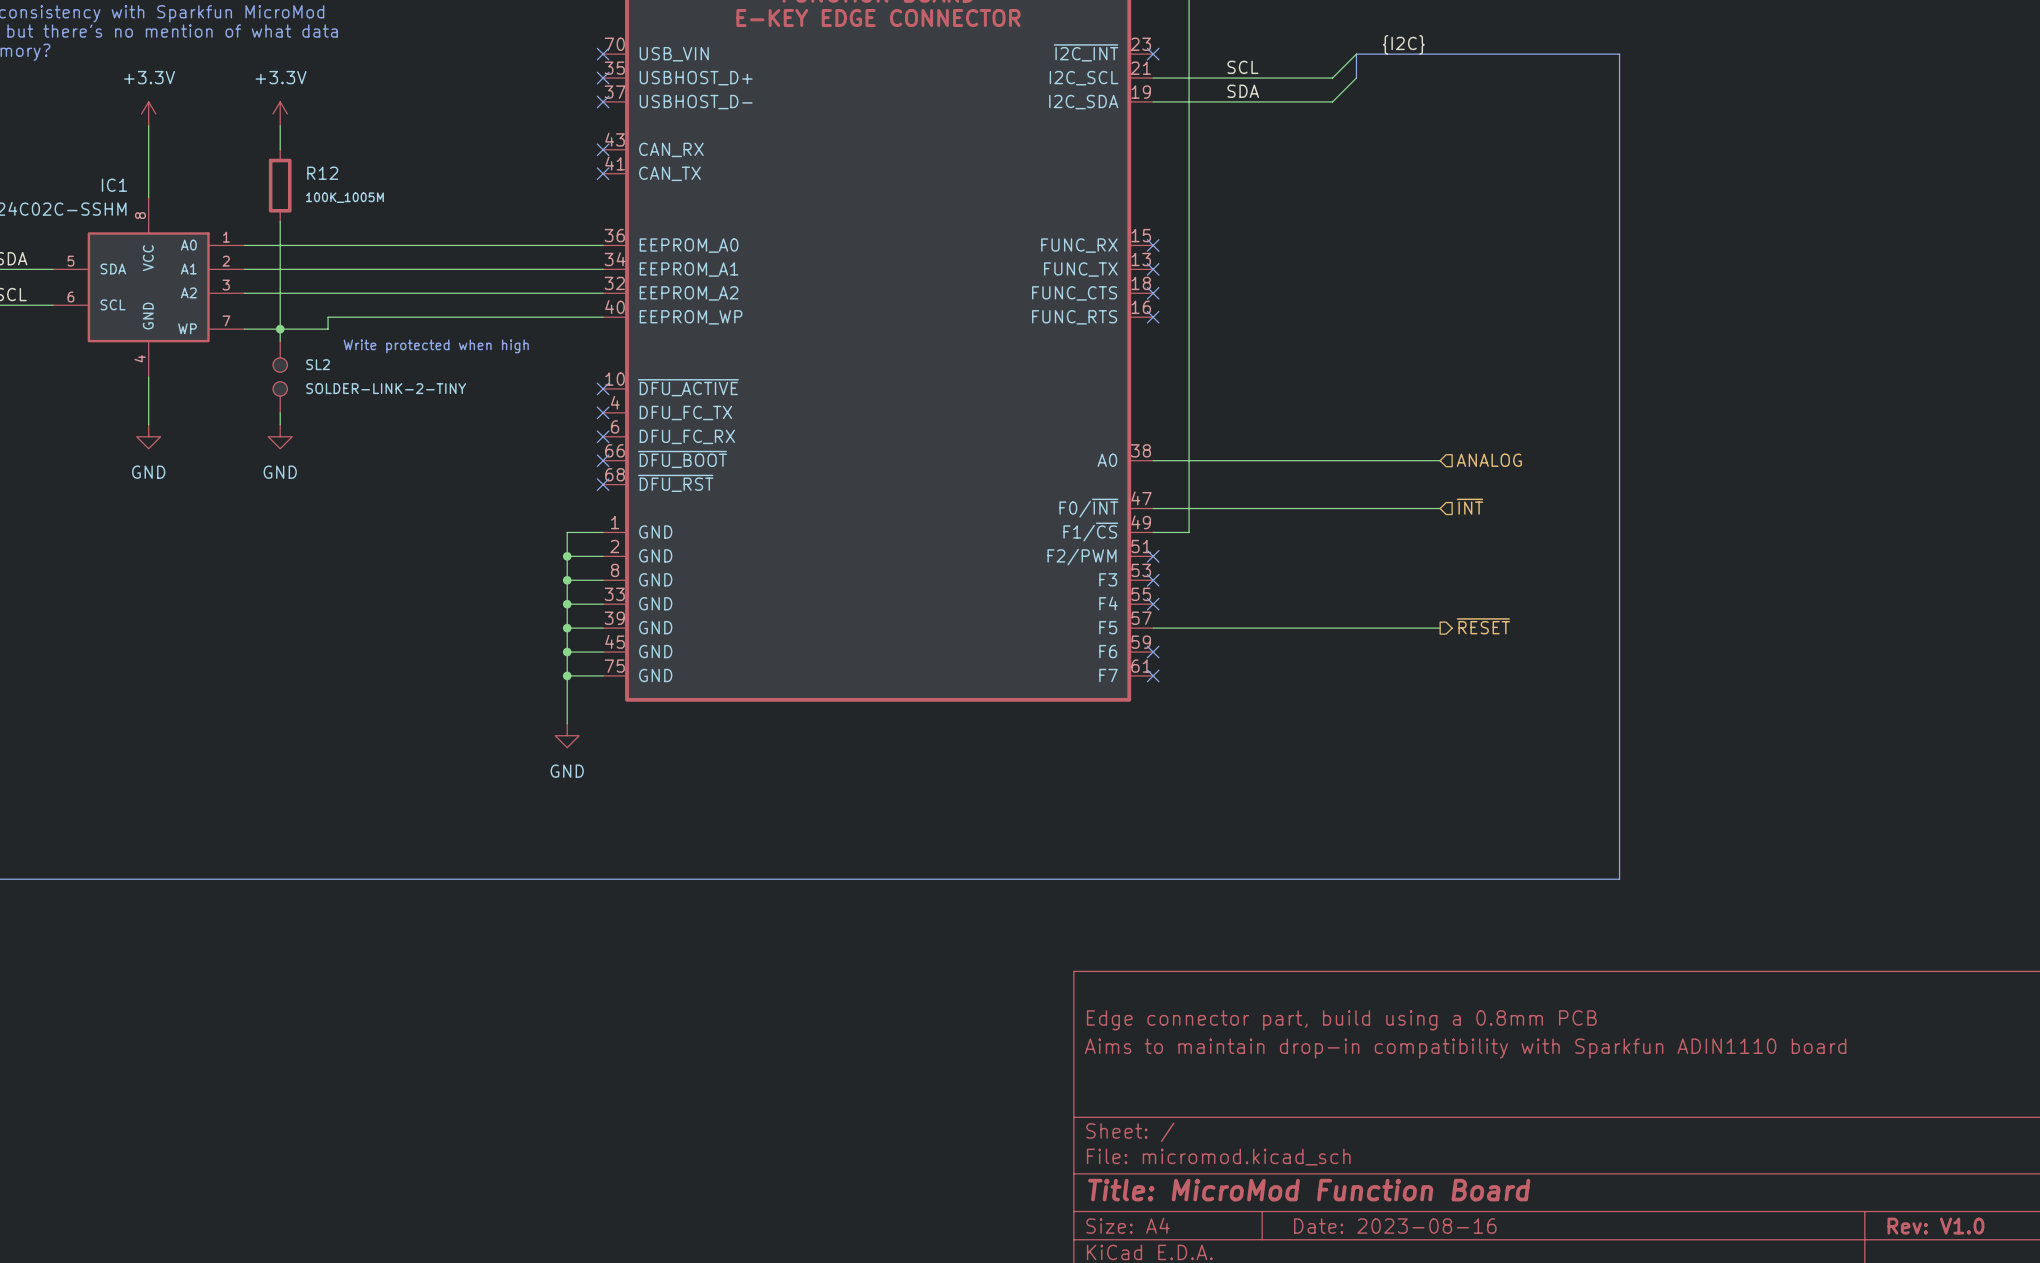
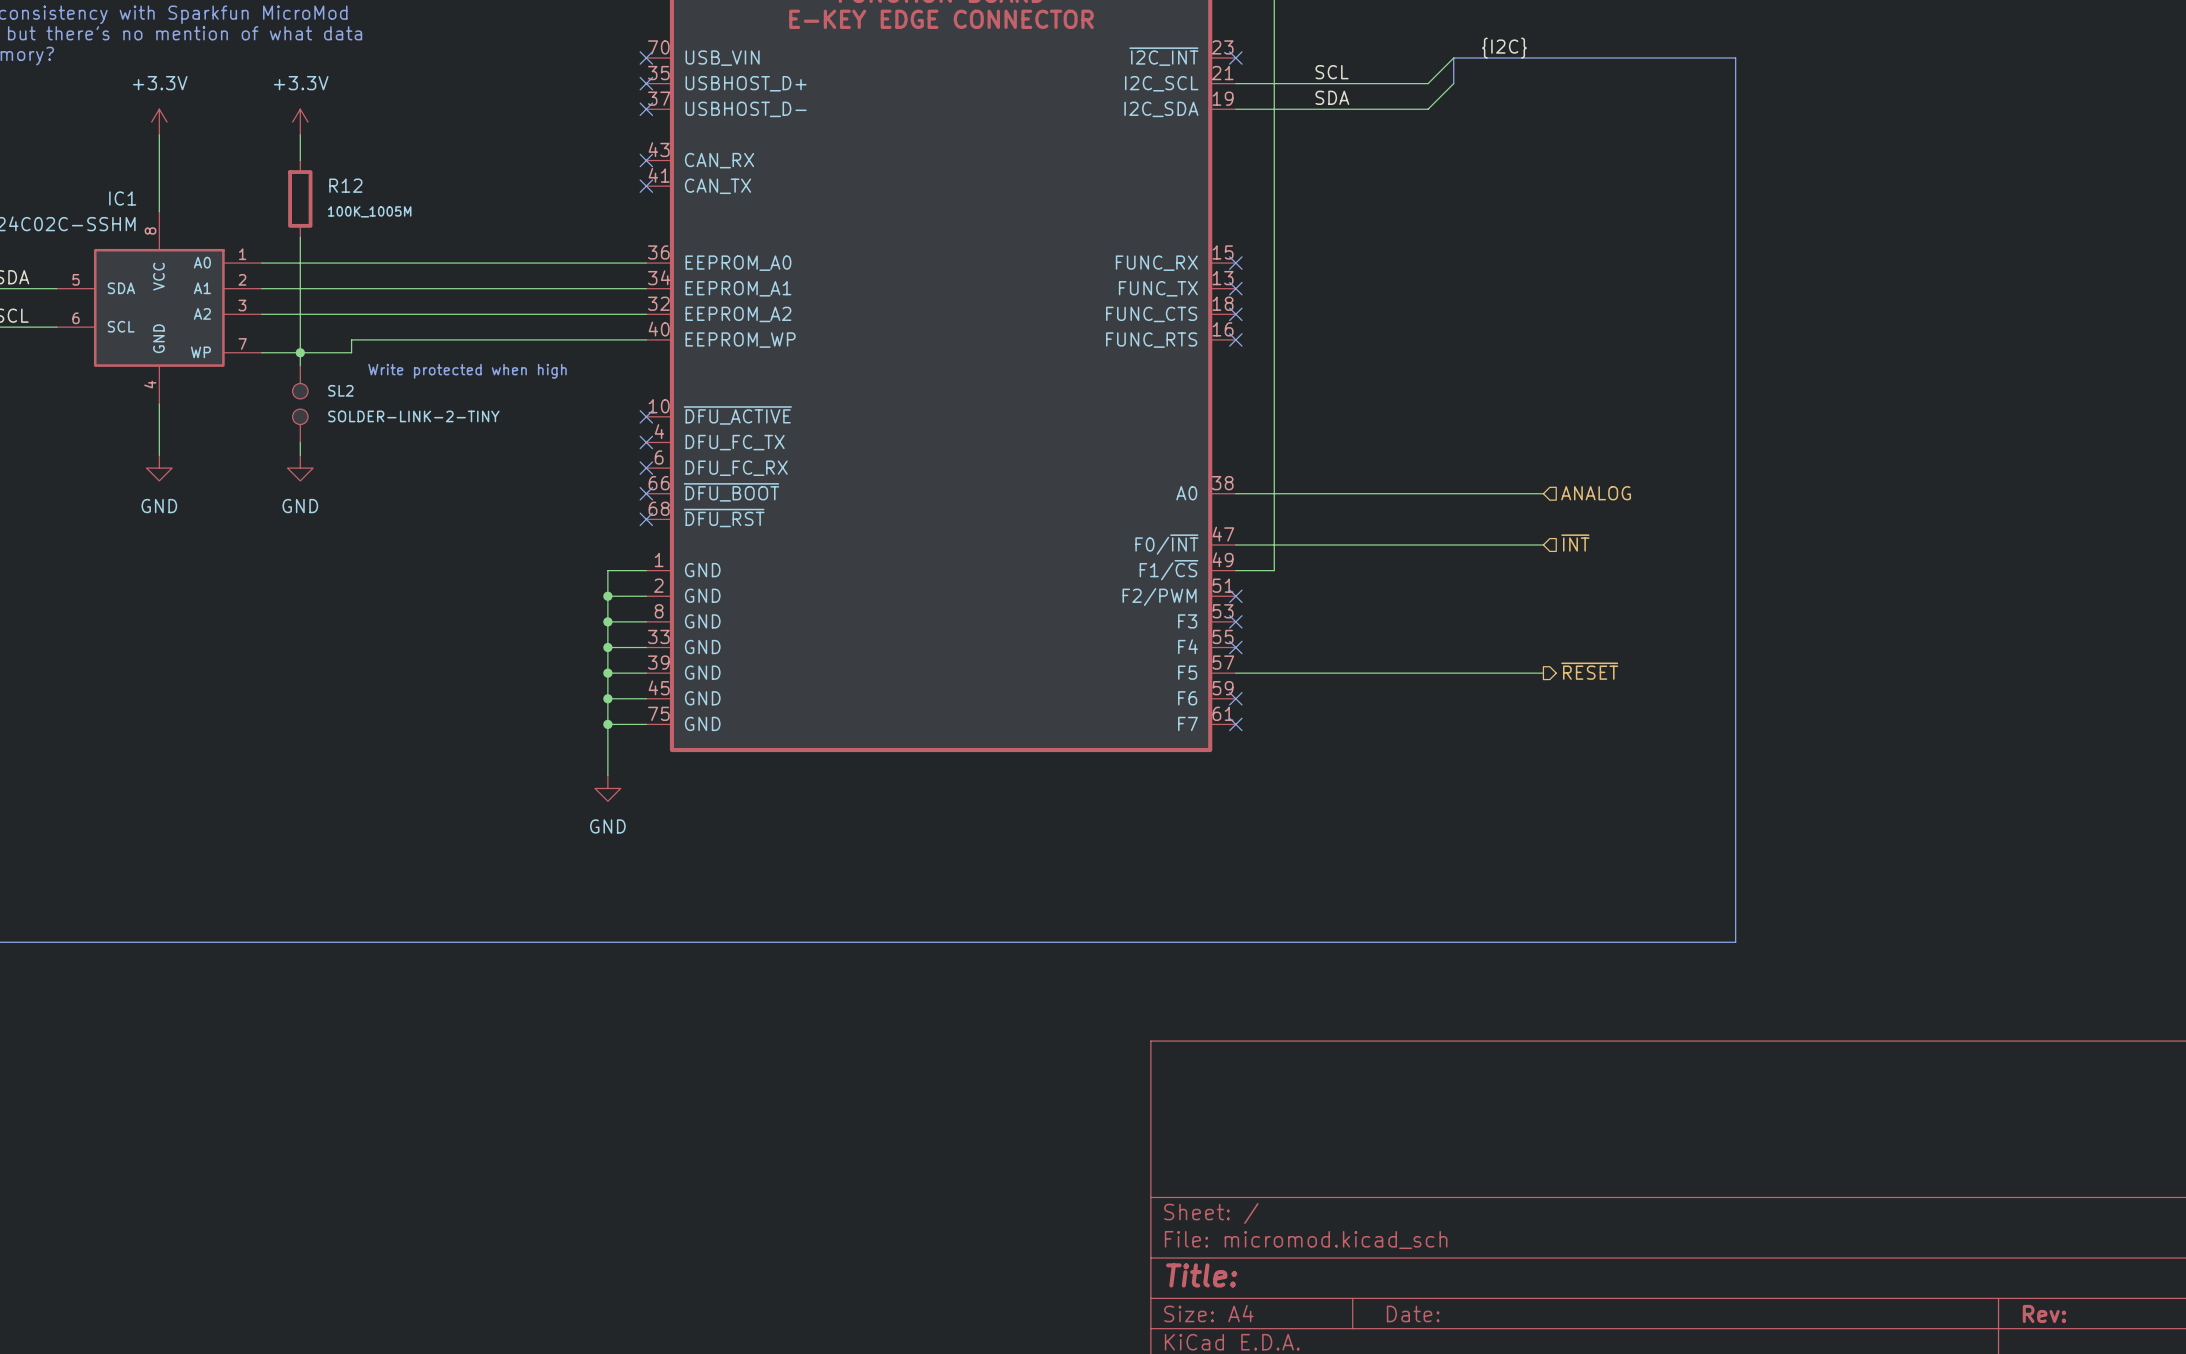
title block: Edge connector part, build using a 0.8mm PCB (1341, 1020) -> none
title block: Aims to maintain drop-in compatibility with Sparkfun ADIN1110 board (1465, 1048) -> none
title block: Title: MicroMod Function Board (1309, 1190) -> Title: (1201, 1275)
title block: Date: 2023-08-16 (1395, 1226) -> Date: (1413, 1313)
title block: Rev: V1.0 (1935, 1226) -> Rev: (2044, 1313)

